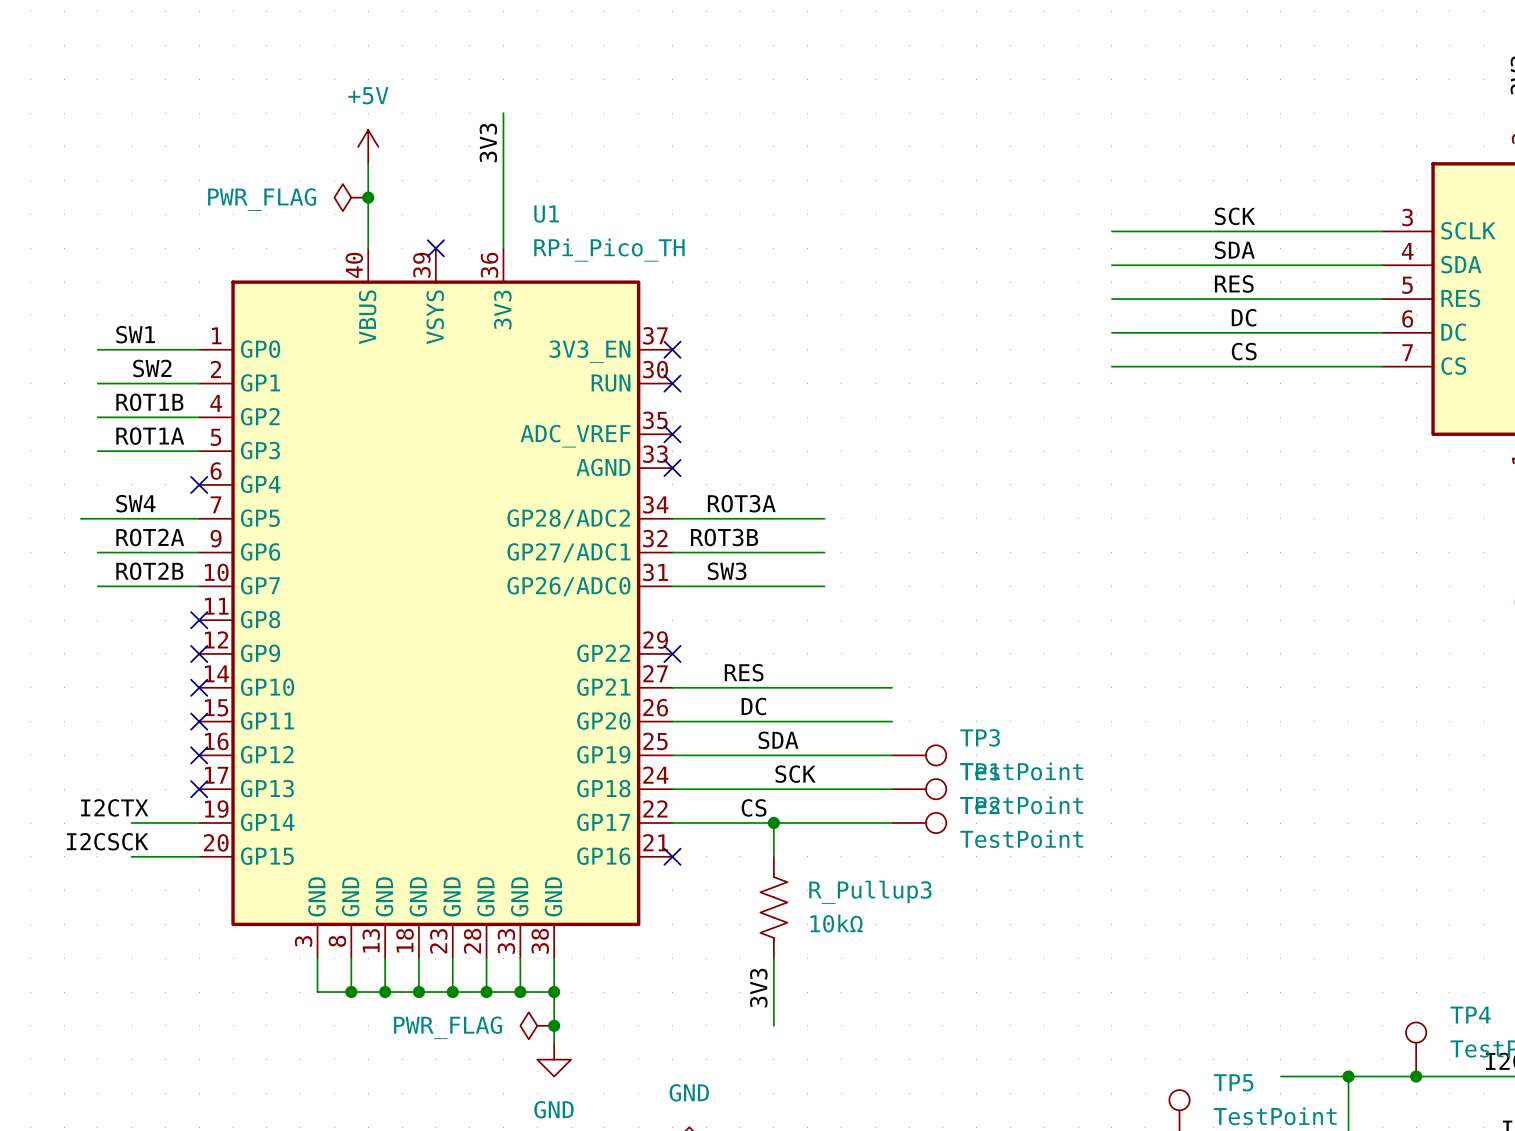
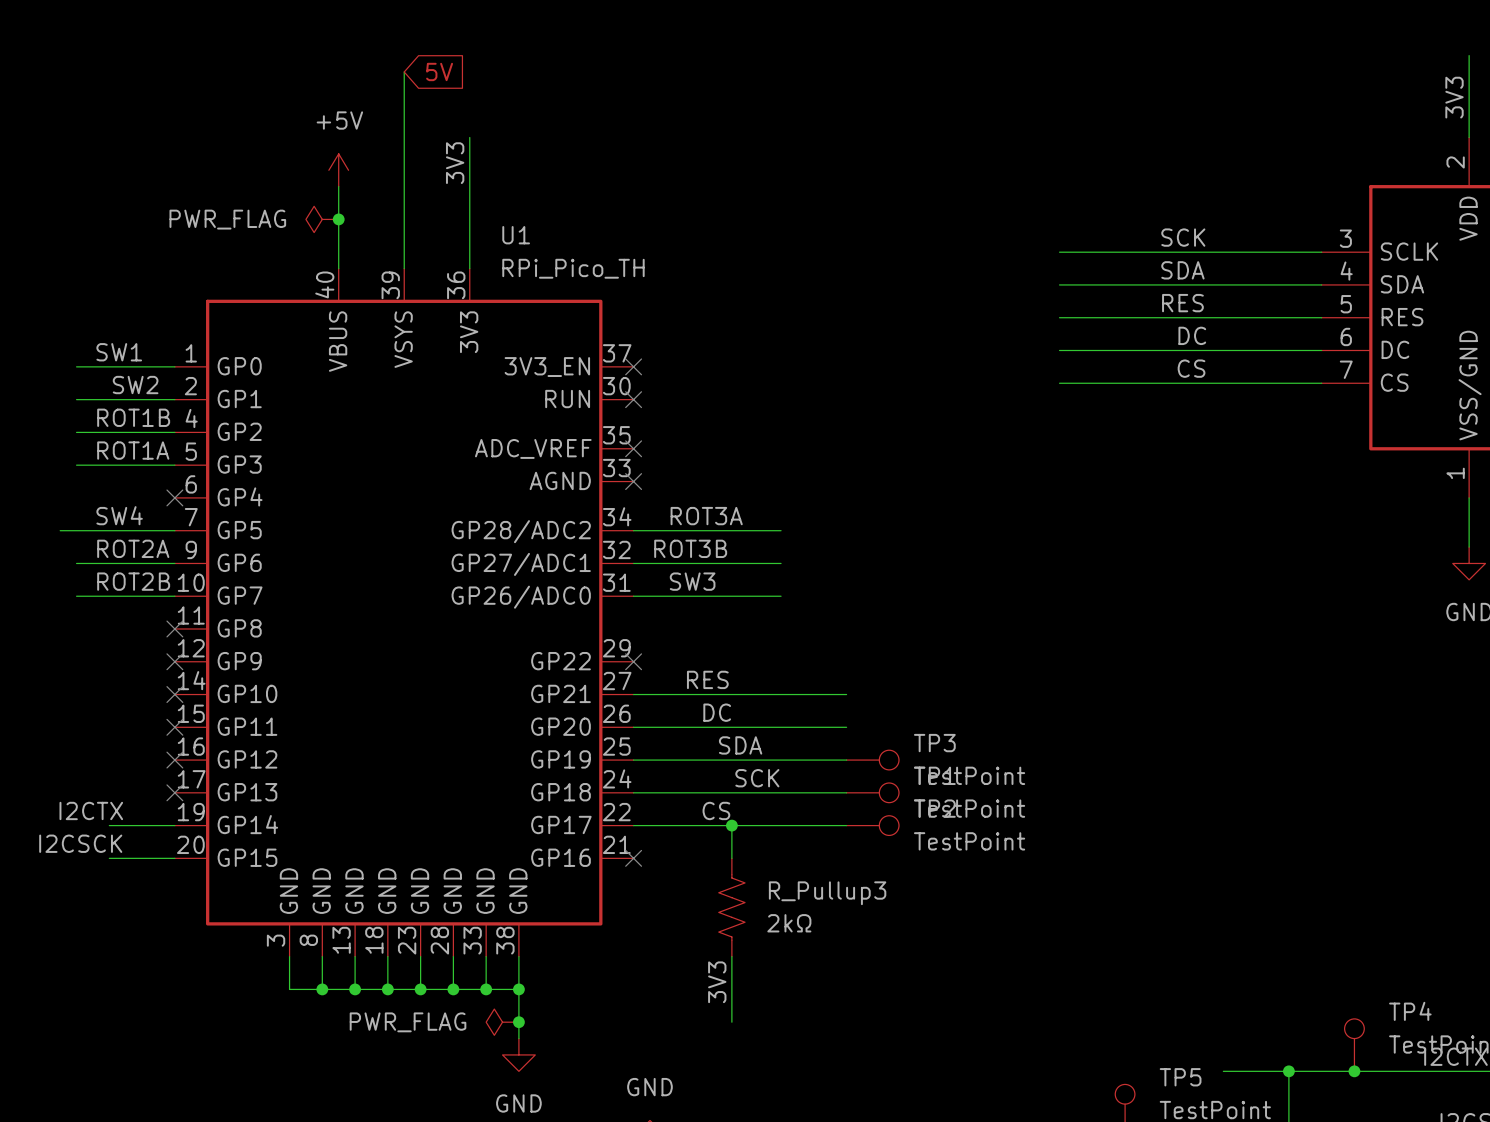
wire: none -> (404, 71) (404, 268)
global label: none -> 5V (439, 71)
no-connect mark: (435, 248) -> none
R_Pullup3 value: 10kΩ (836, 923) -> 2kΩ (789, 923)

